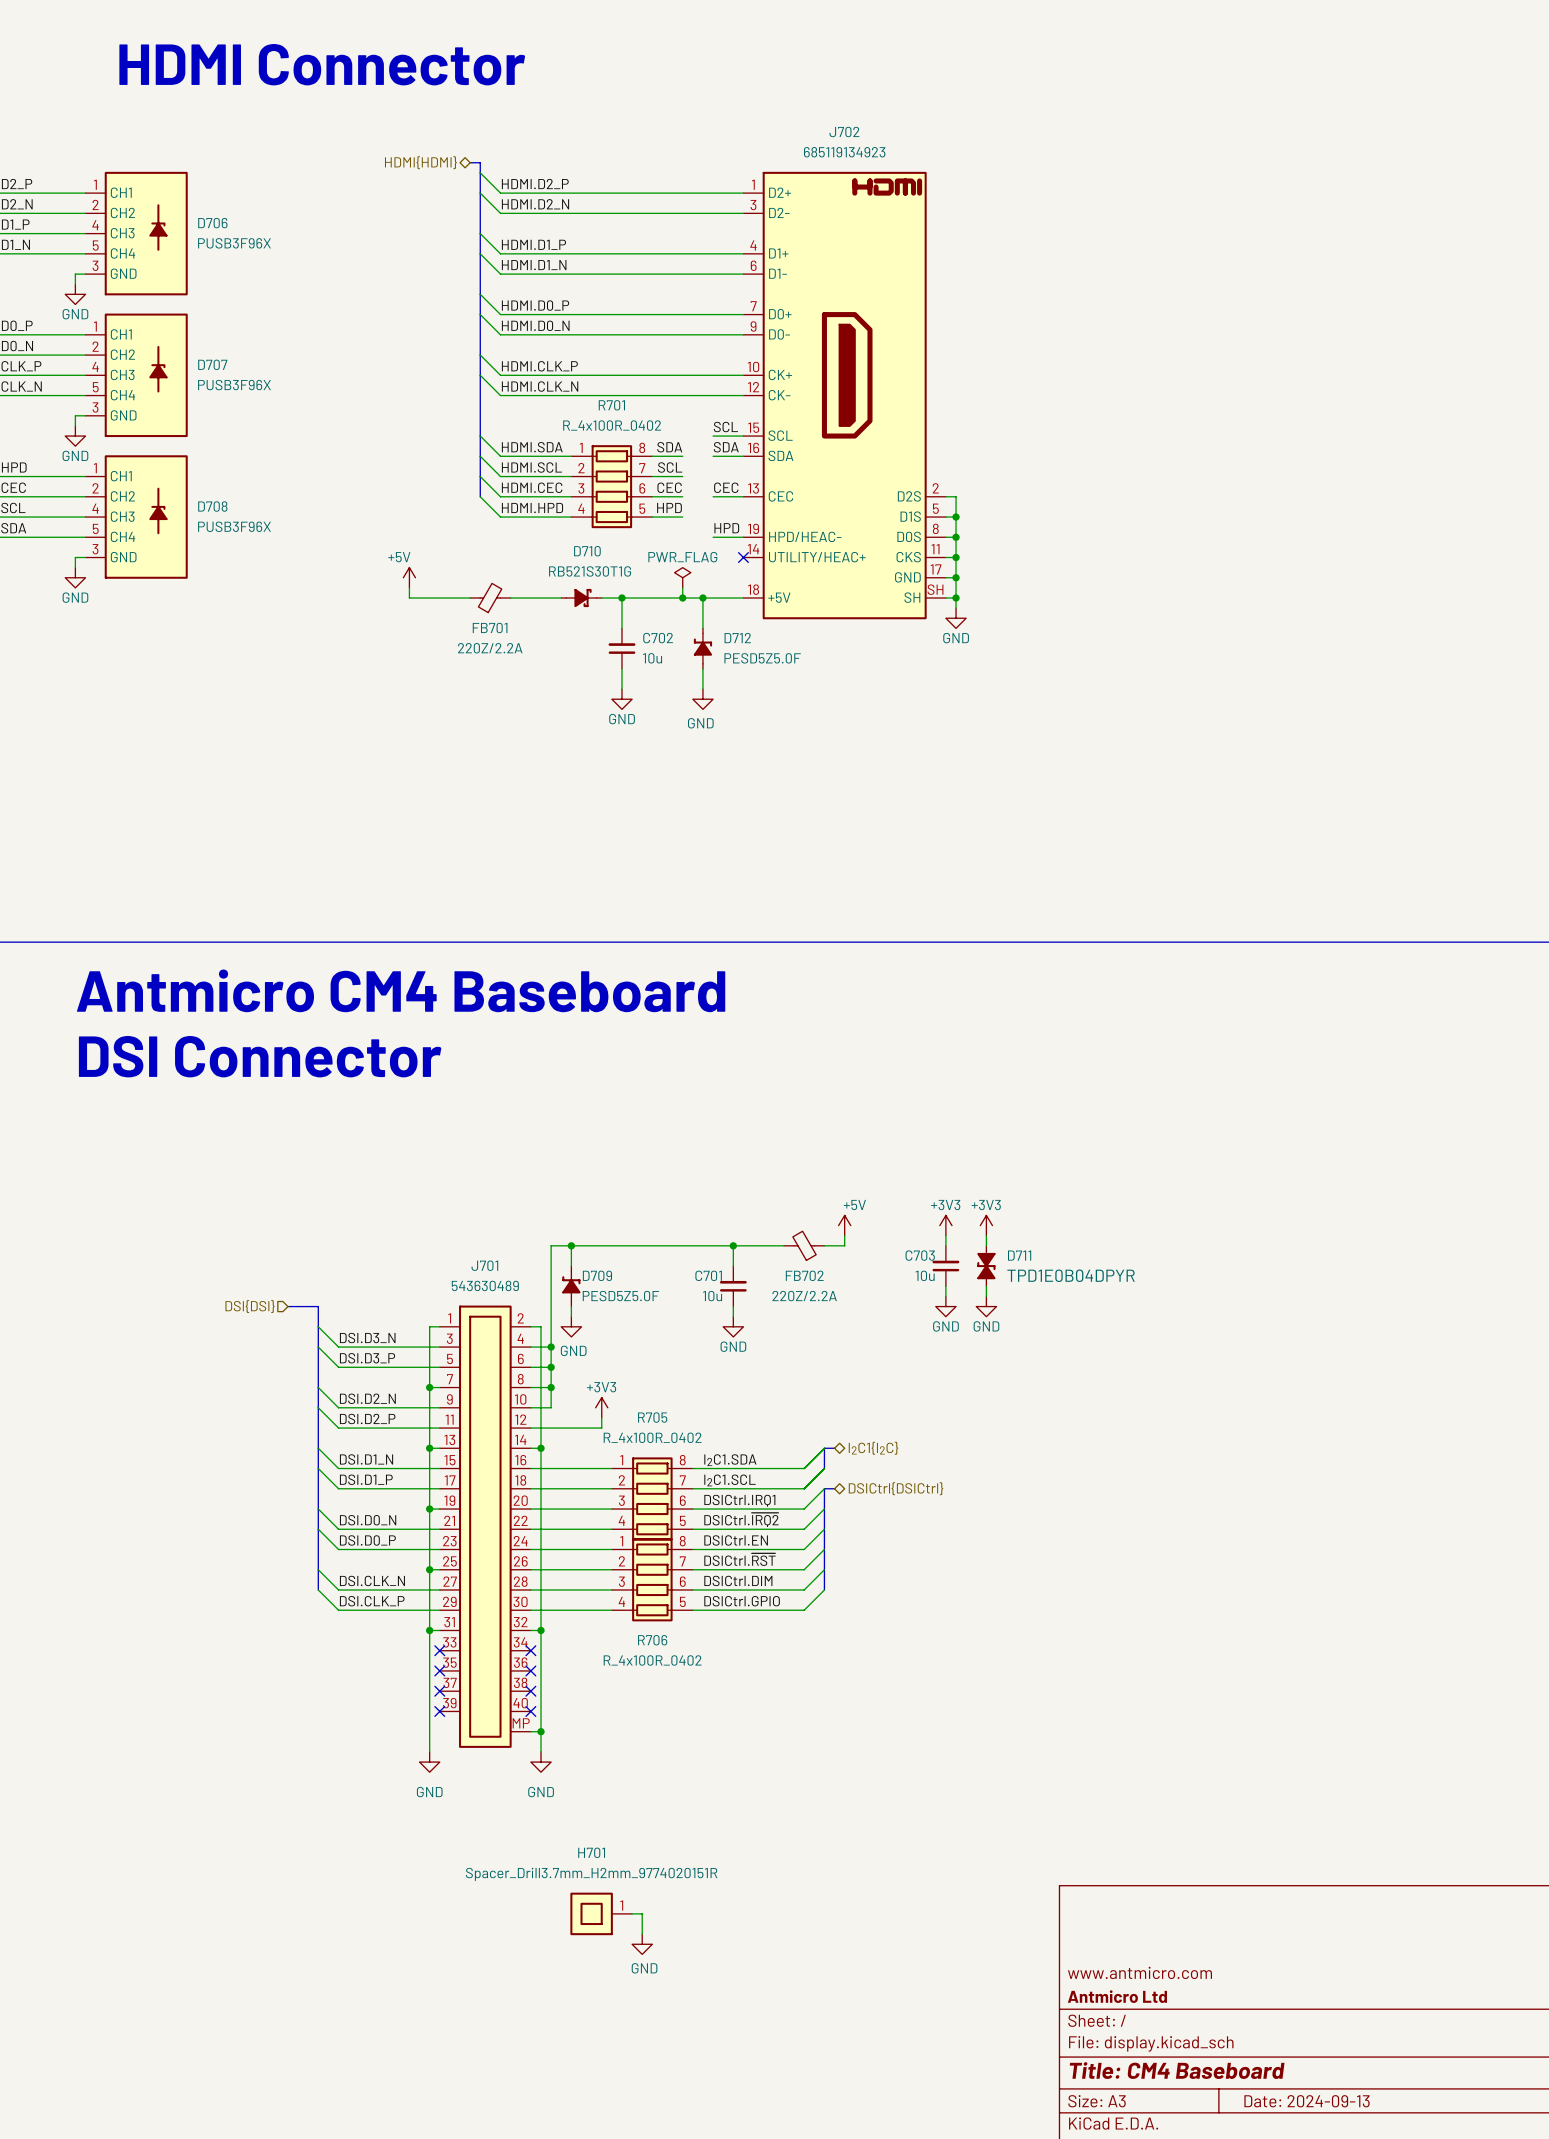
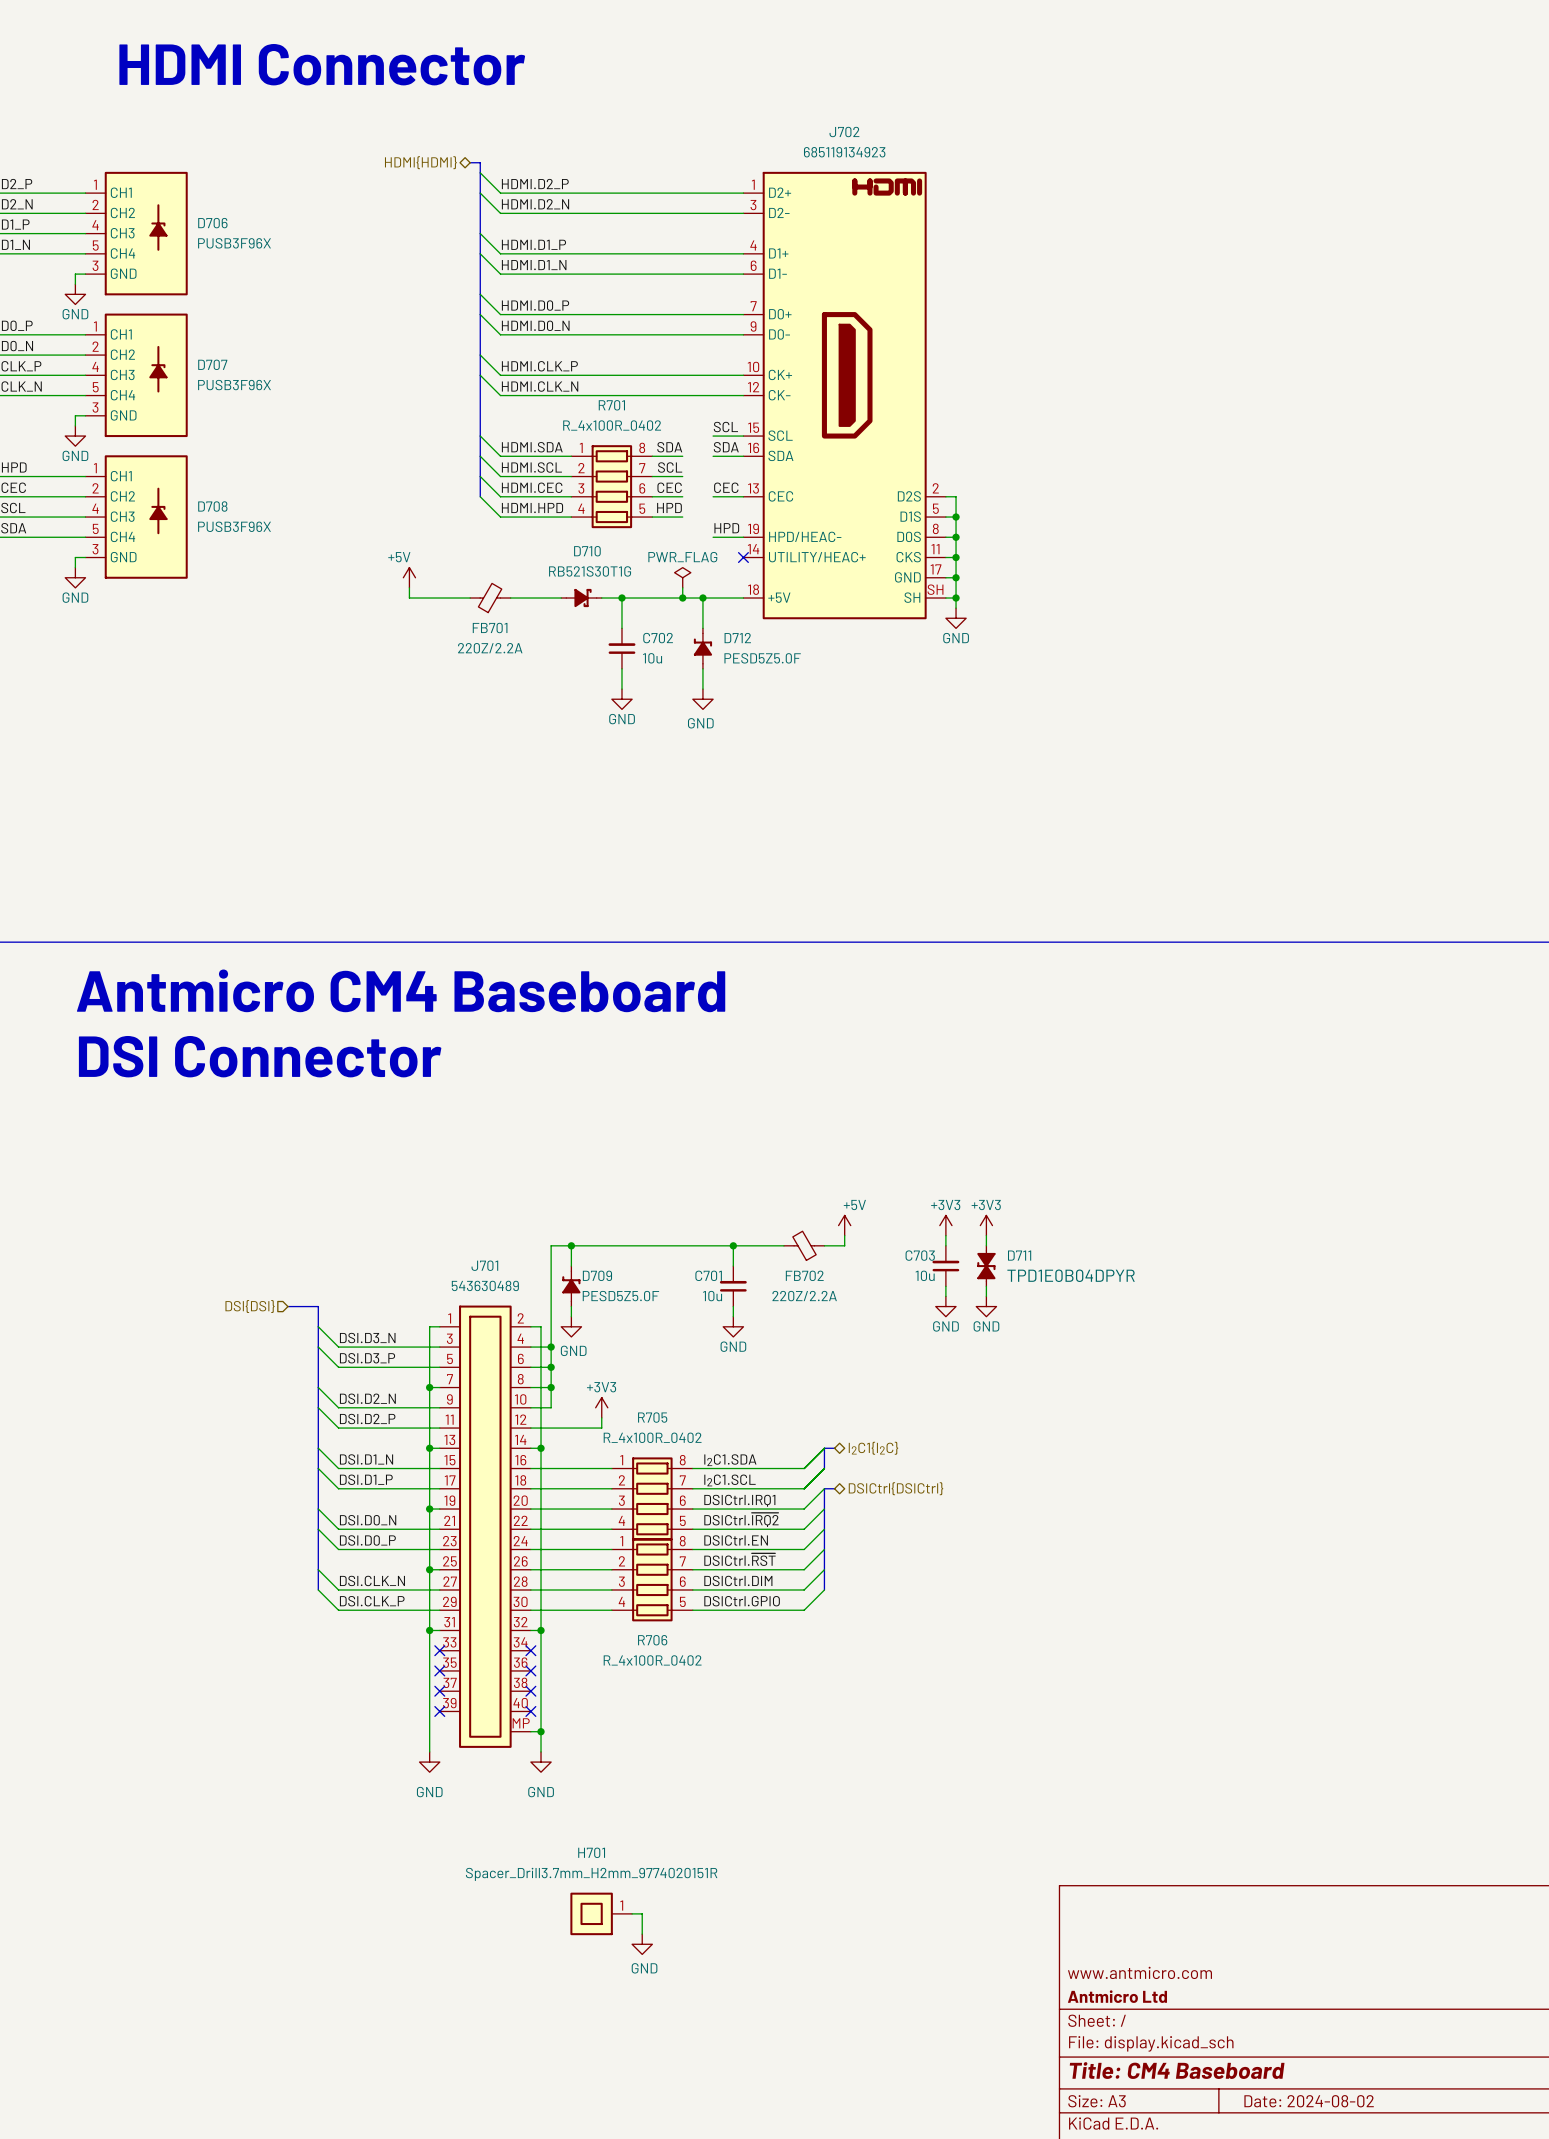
title block: Date: 2024-09-13 (1307, 2101) -> Date: 2024-08-02 (1309, 2101)

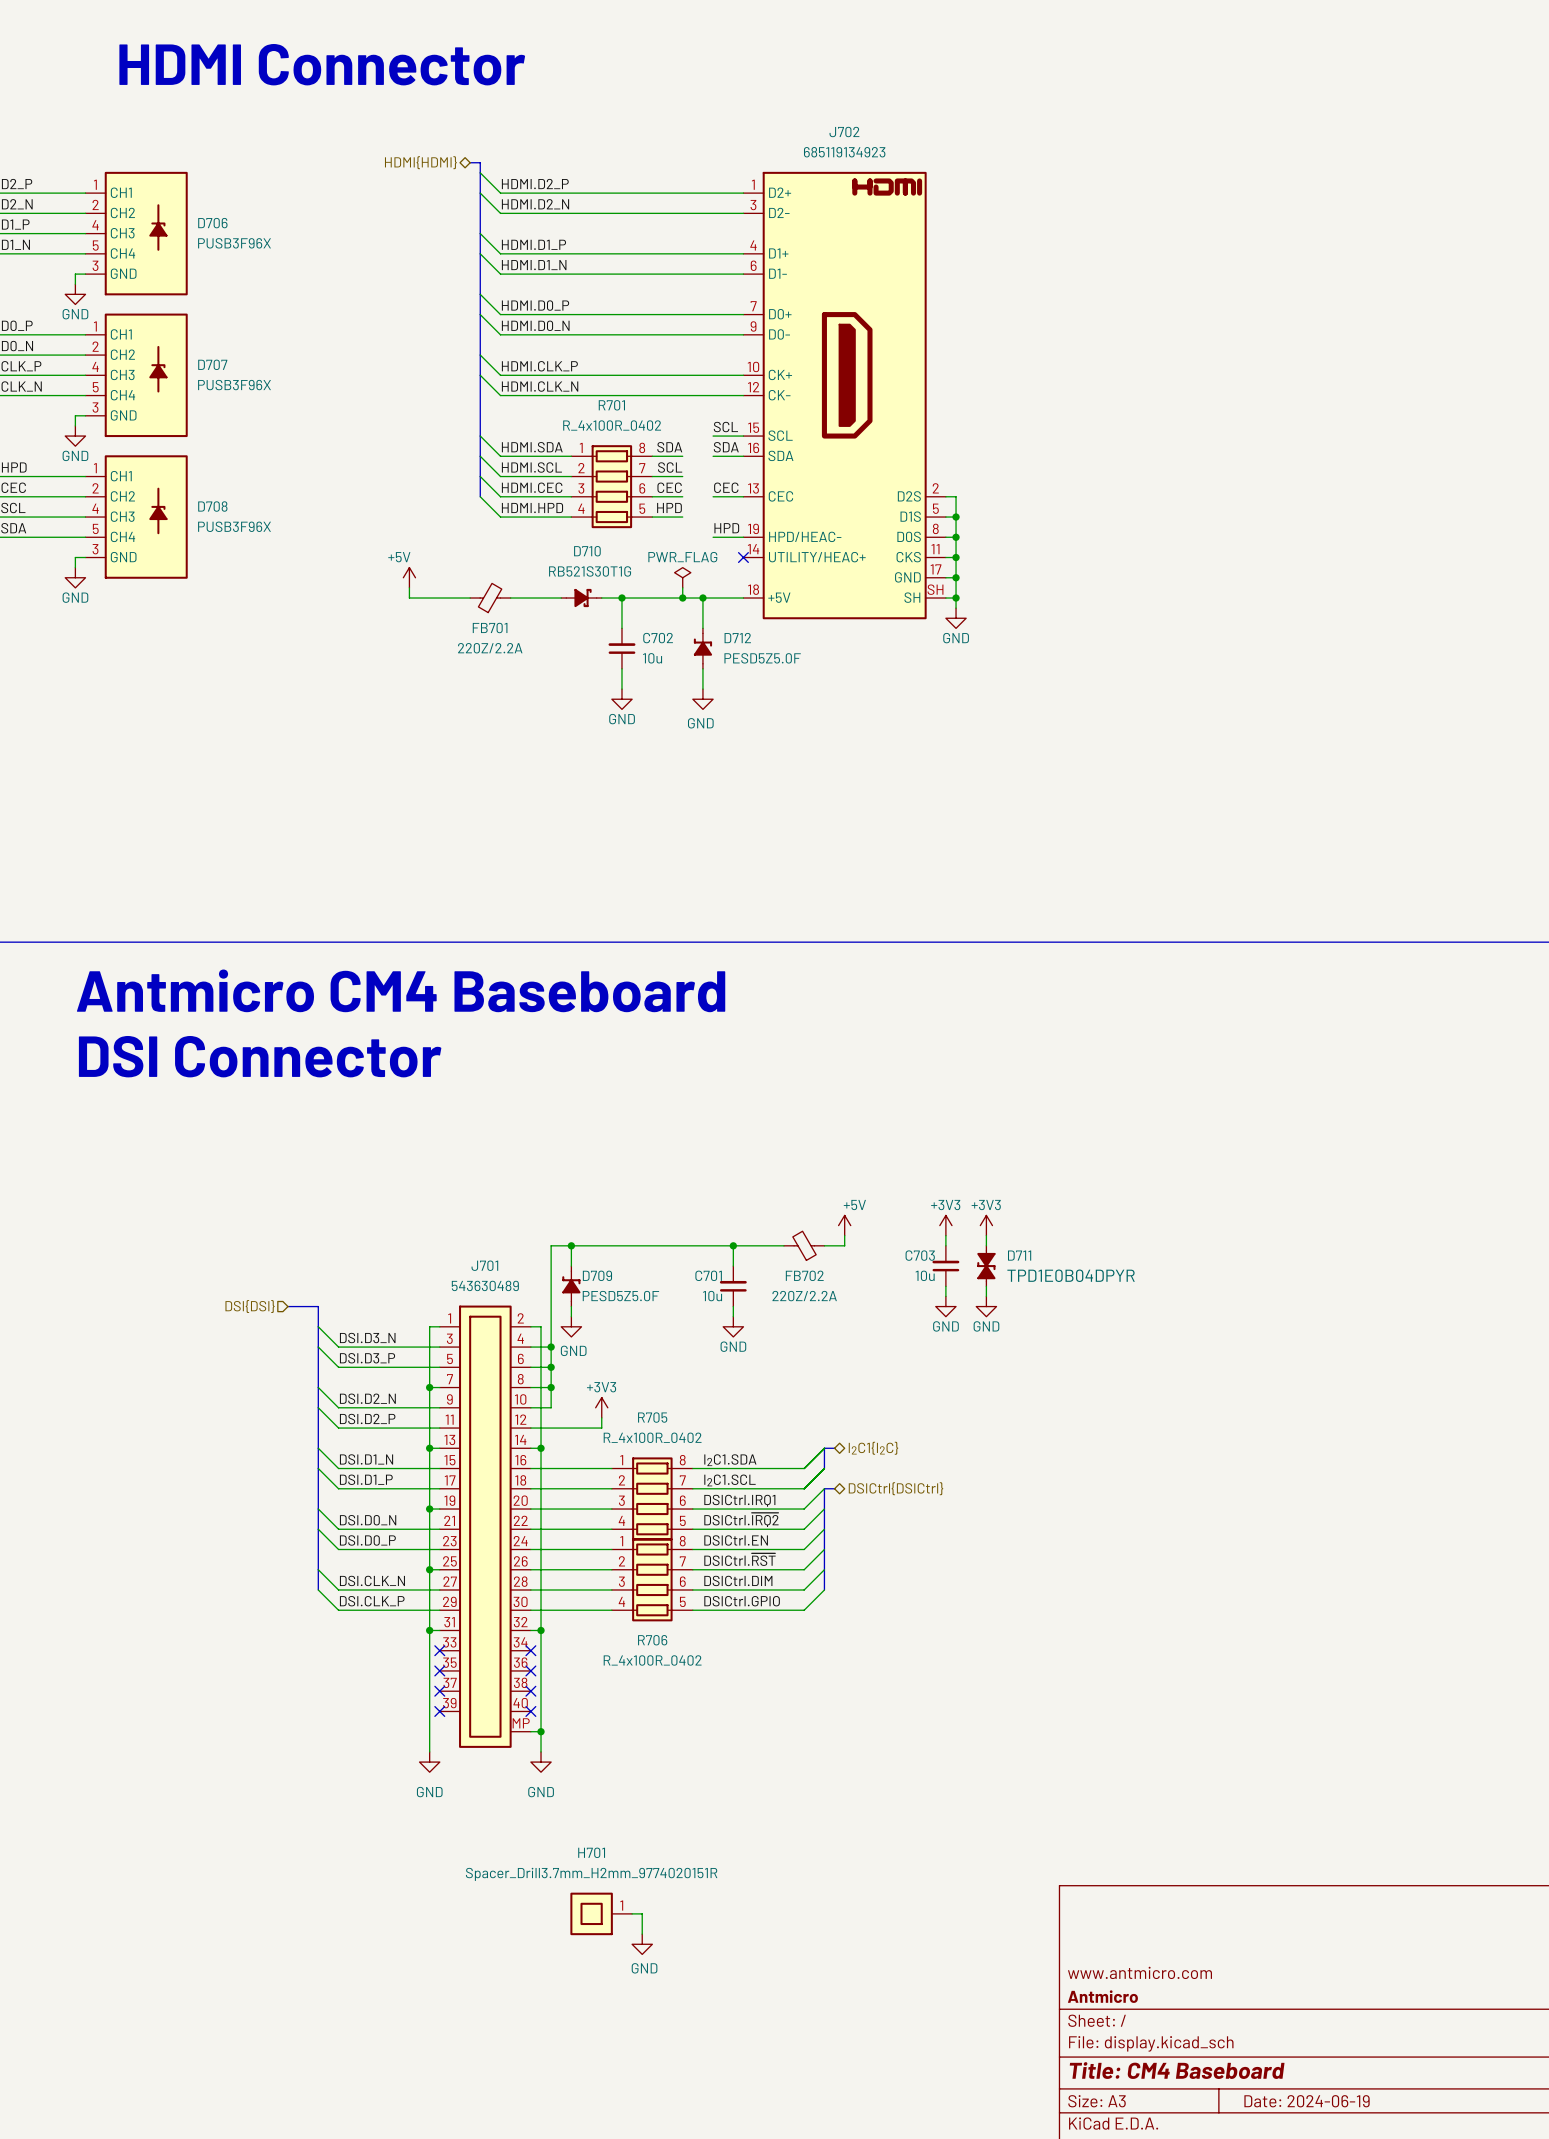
title block: Antmicro Ltd (1117, 1996) -> Antmicro (1102, 1996)
title block: Date: 2024-08-02 (1309, 2101) -> Date: 2024-06-19 (1307, 2101)

